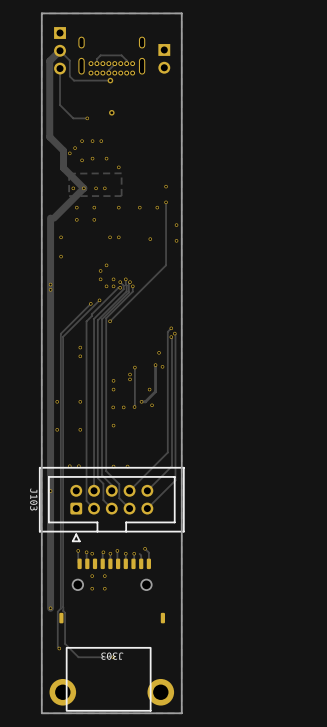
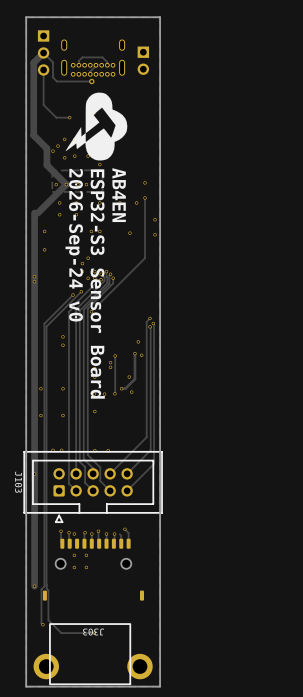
drawing: none -> [65, 92, 128, 161]
text: none -> AB4EN (119, 195)
text: none -> 2026-Sep-24 v0 (74, 245)
text: none -> ESP32-S3 Sensor Board (97, 284)

